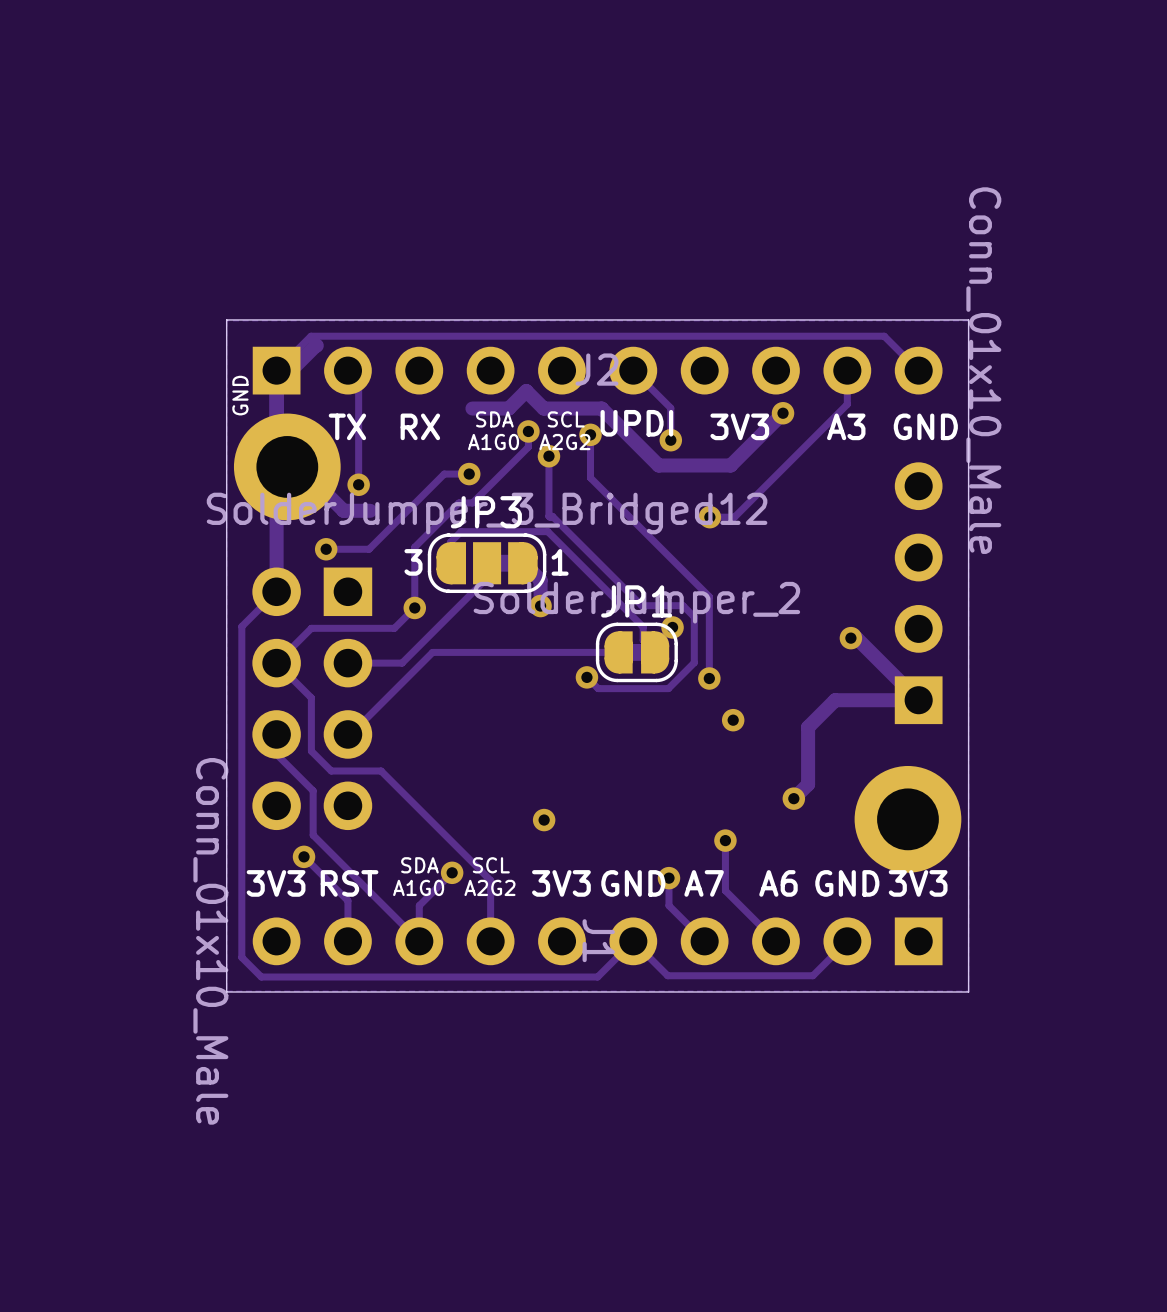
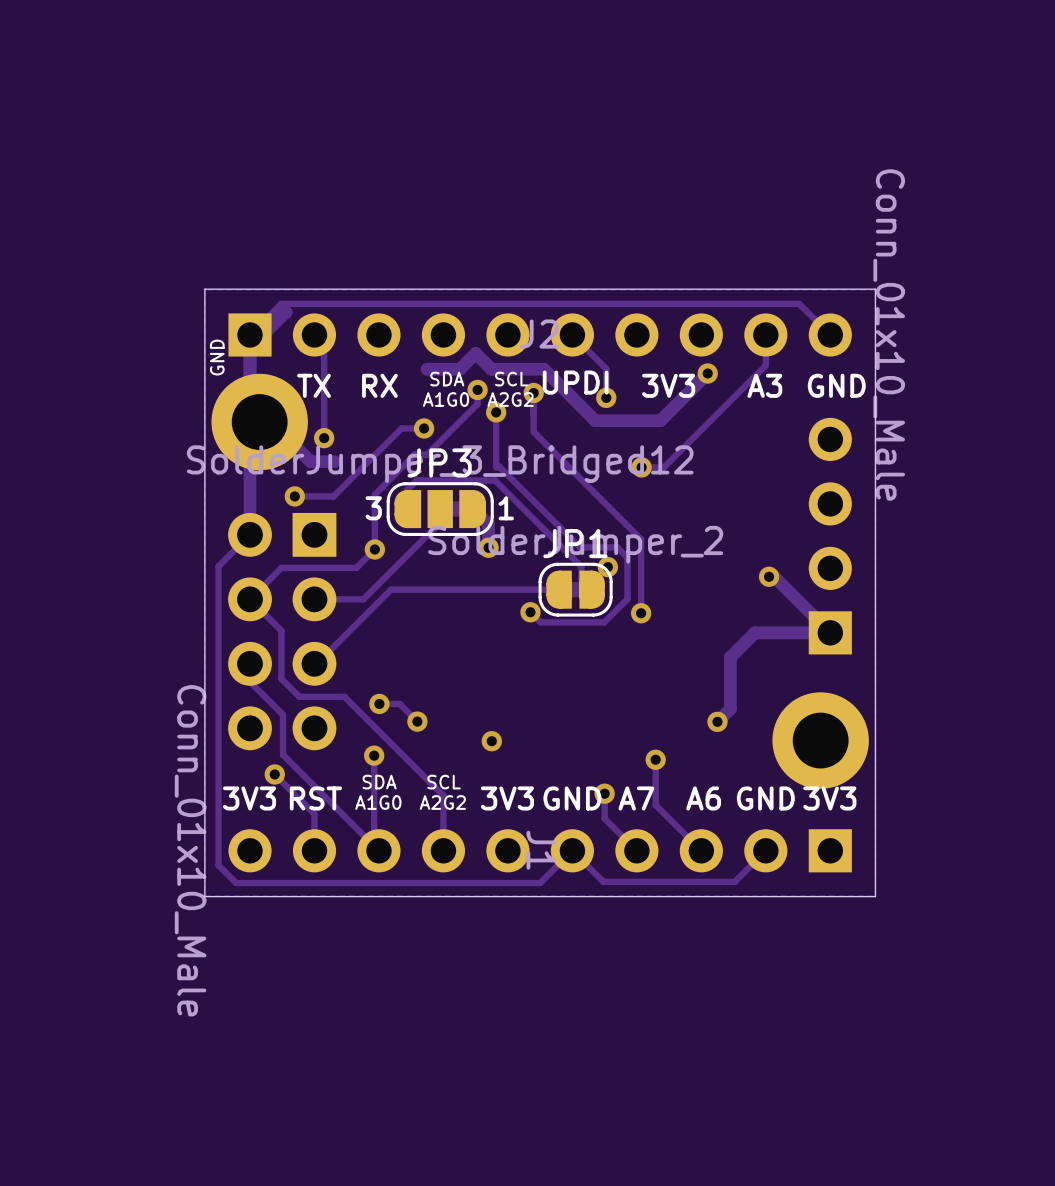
via: (733, 720) -> none
track: none -> (379, 703) (399, 703) (417, 721)
via: none -> (379, 703)
via: none -> (417, 721)
track: none -> (374, 755) (374, 846)
via: none -> (374, 755)
track: (452, 872) (419, 905) (419, 941) -> none
via: (452, 872) -> none

